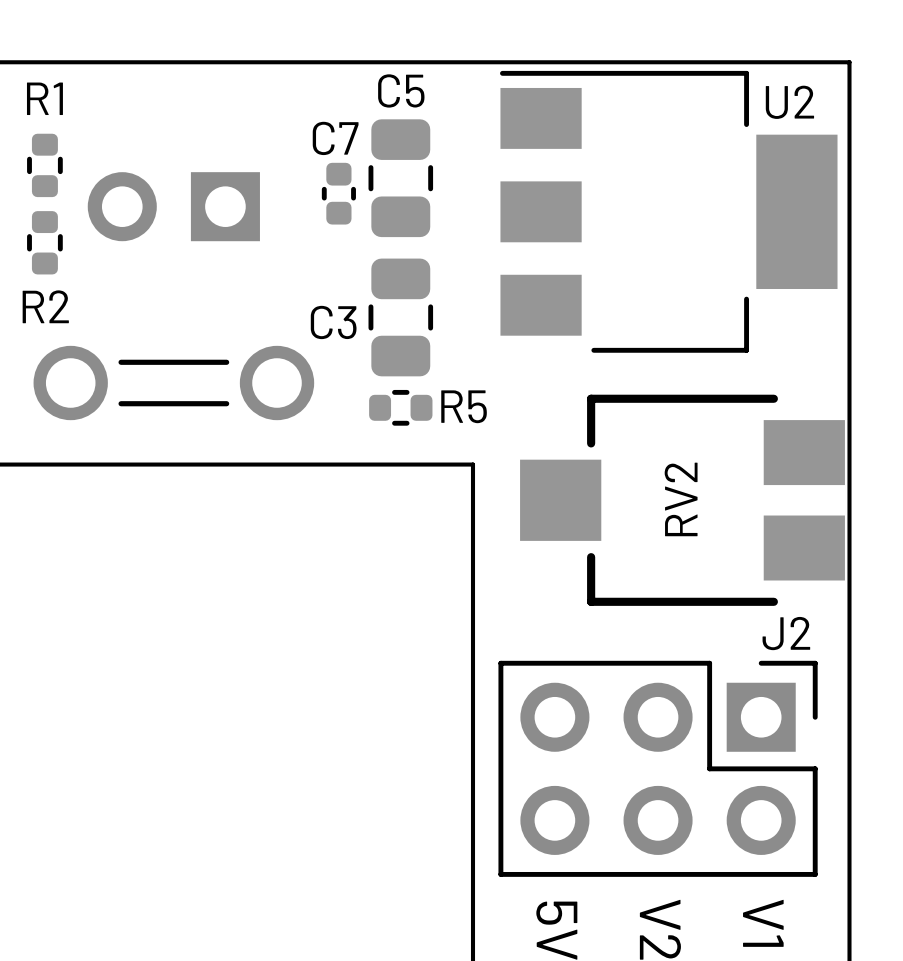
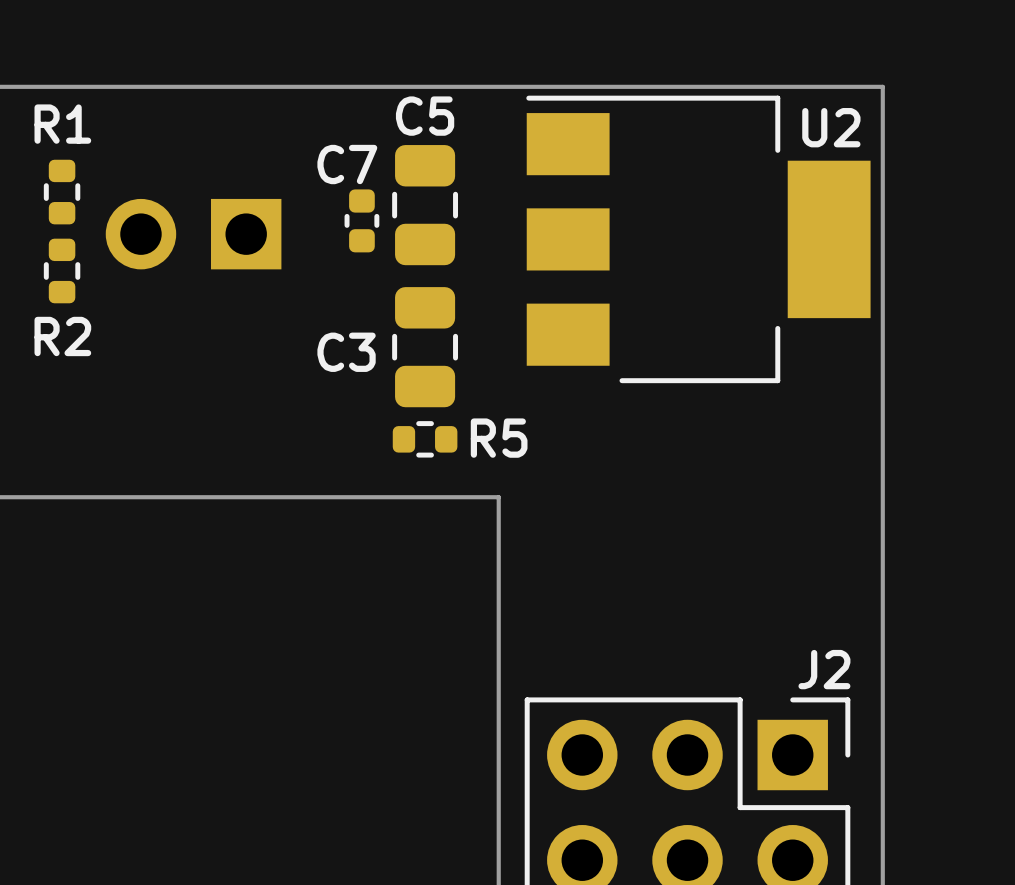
part: (173, 383) -> none
RV2: (682, 500) -> none

